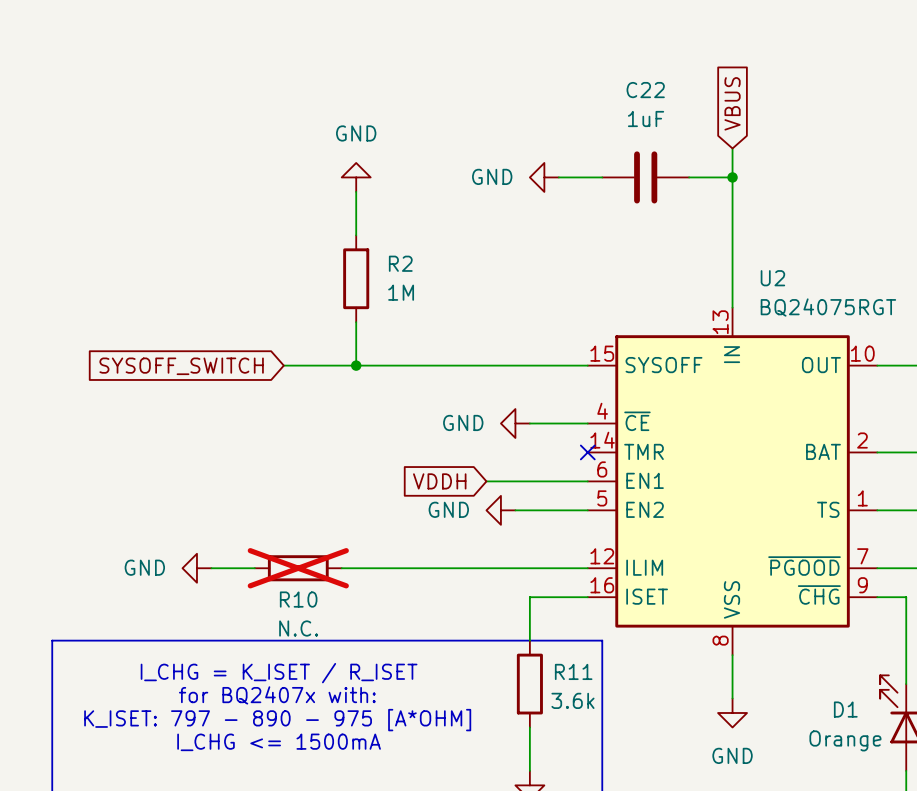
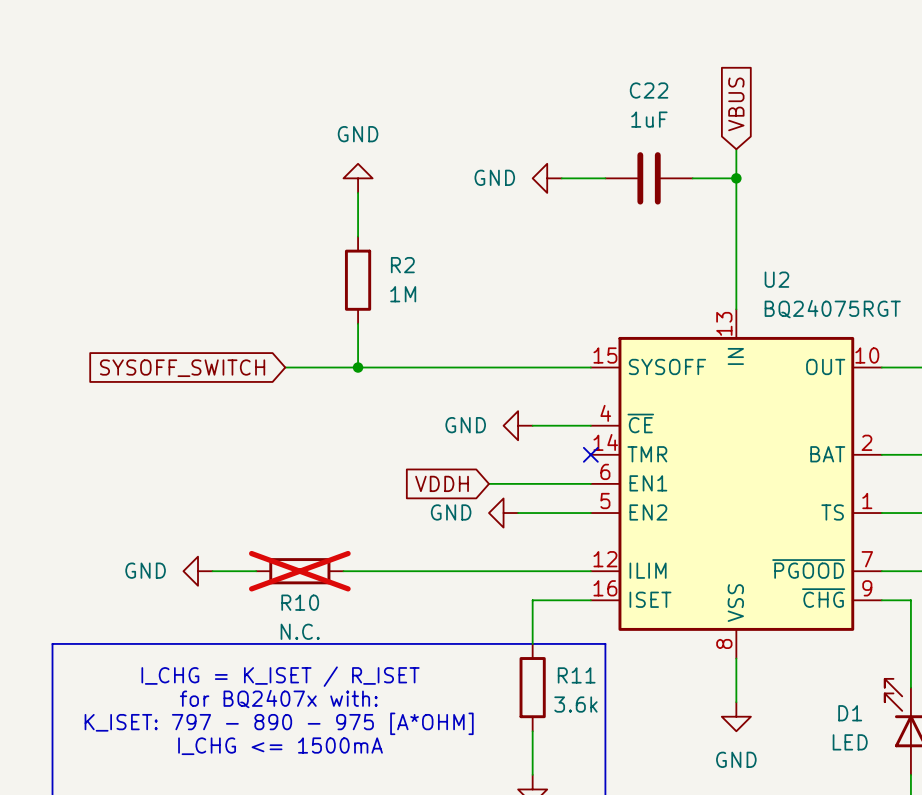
D1 value: Orange (845, 740) -> LED (850, 742)

